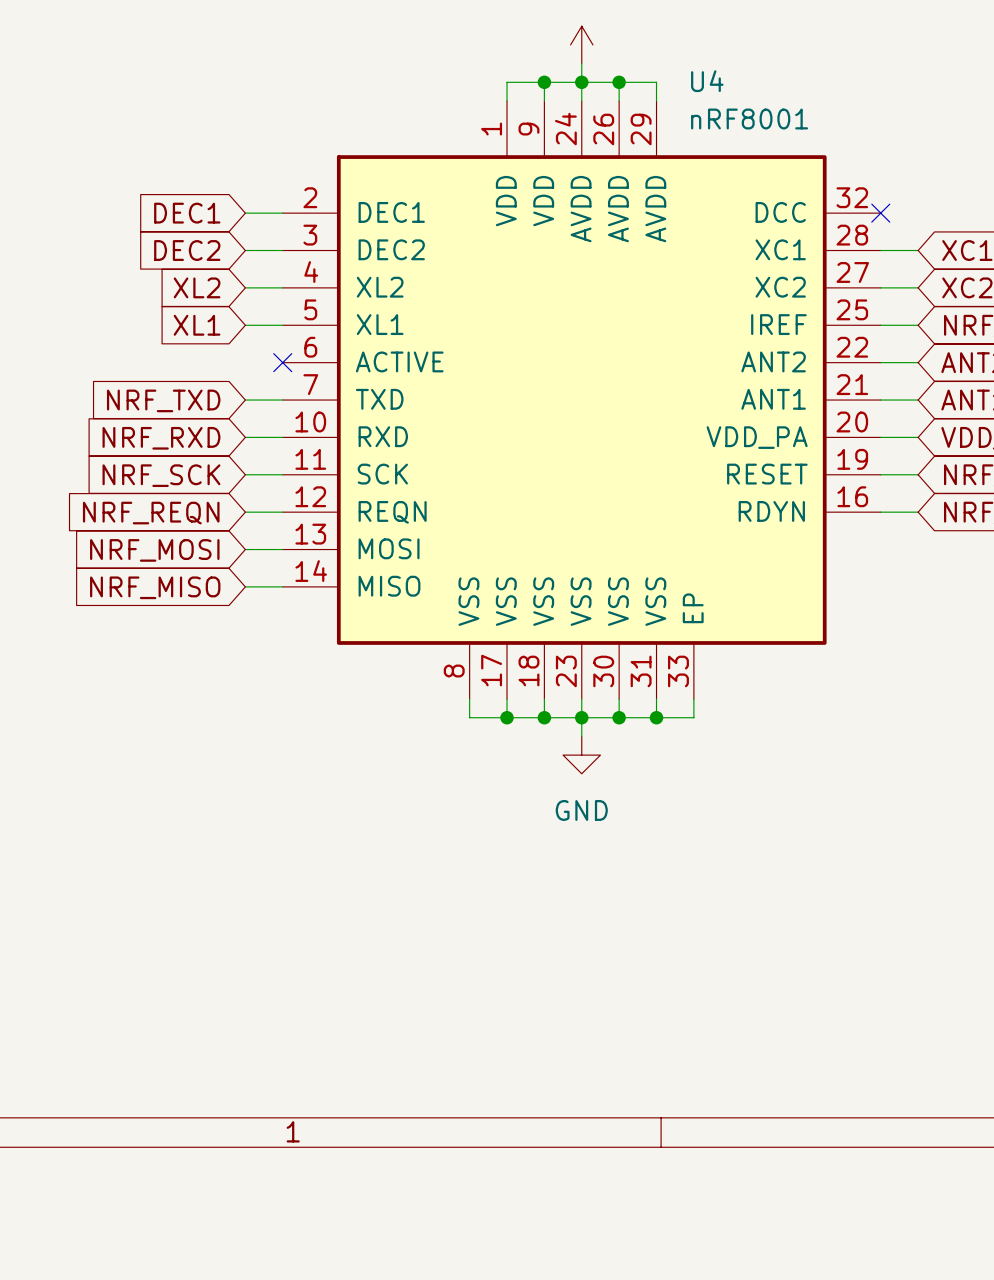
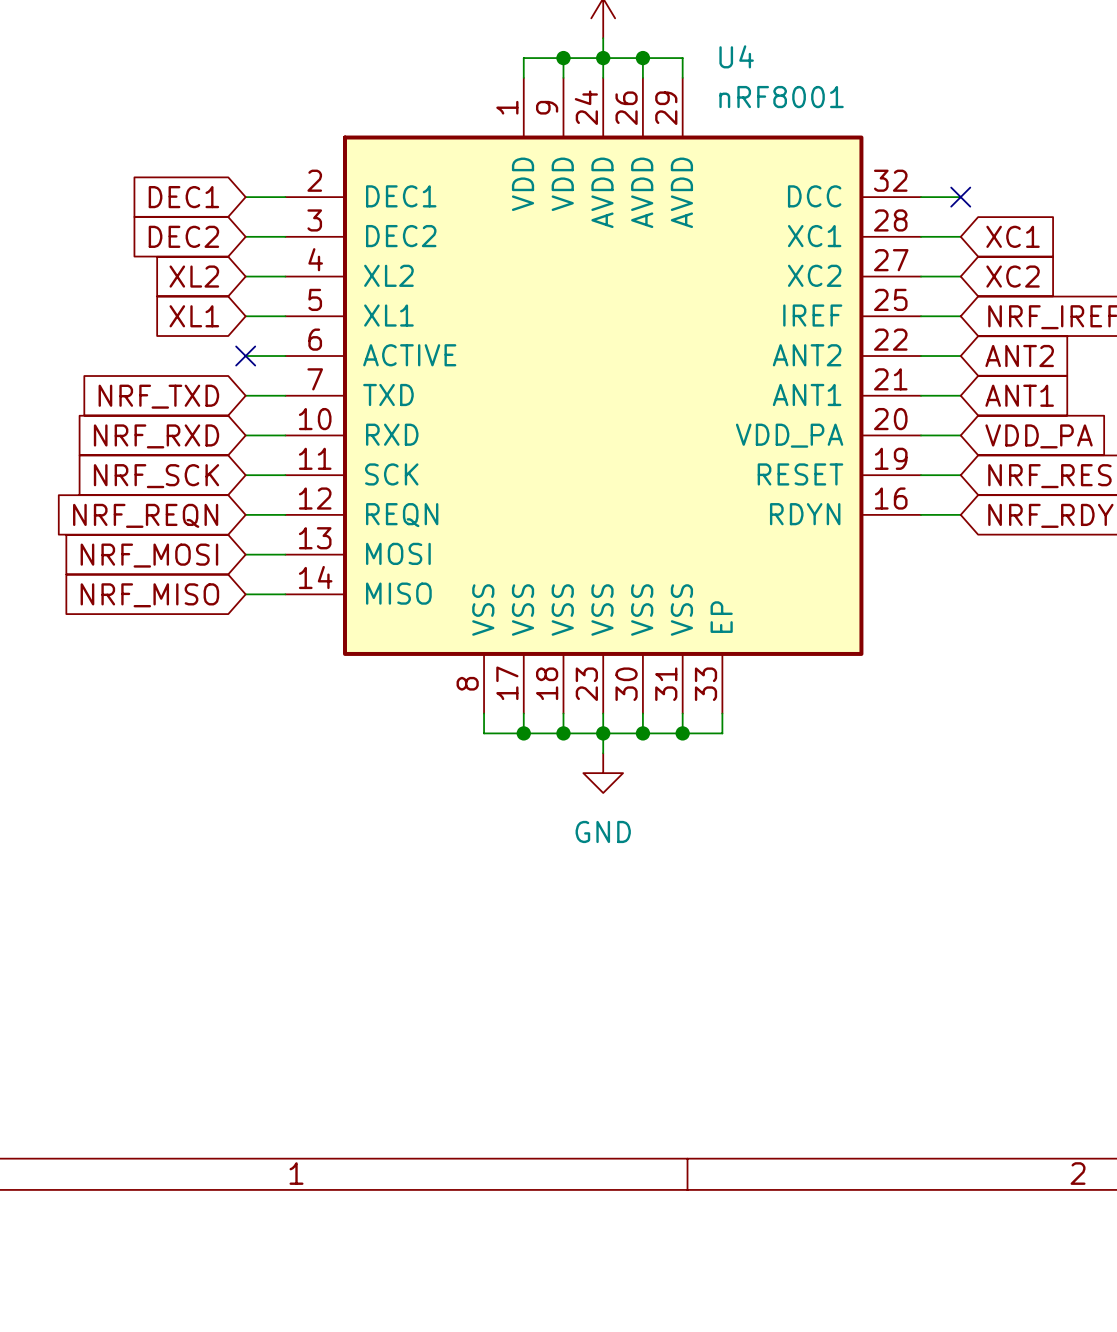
wire: none -> (921, 197) (960, 197)
no-connect mark position: (880, 213) -> (960, 197)
wire: none -> (245, 356) (285, 356)
no-connect mark position: (282, 362) -> (245, 356)

